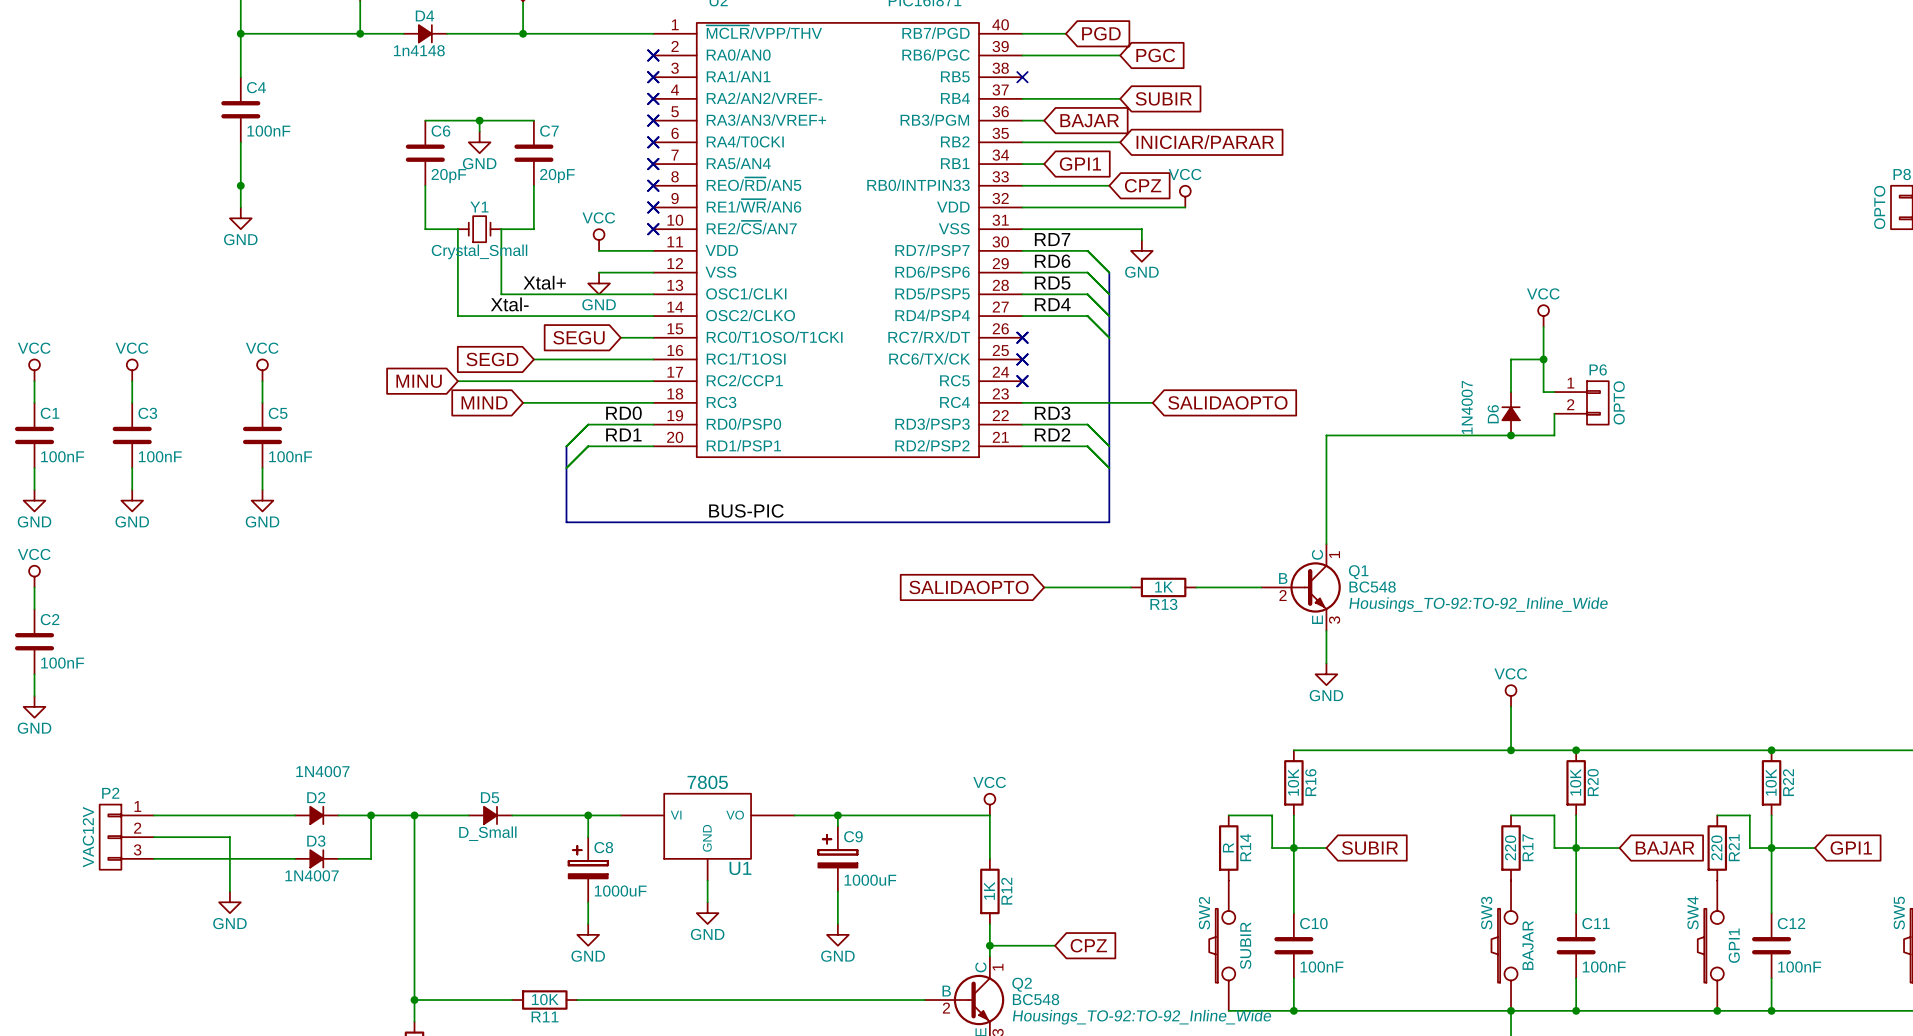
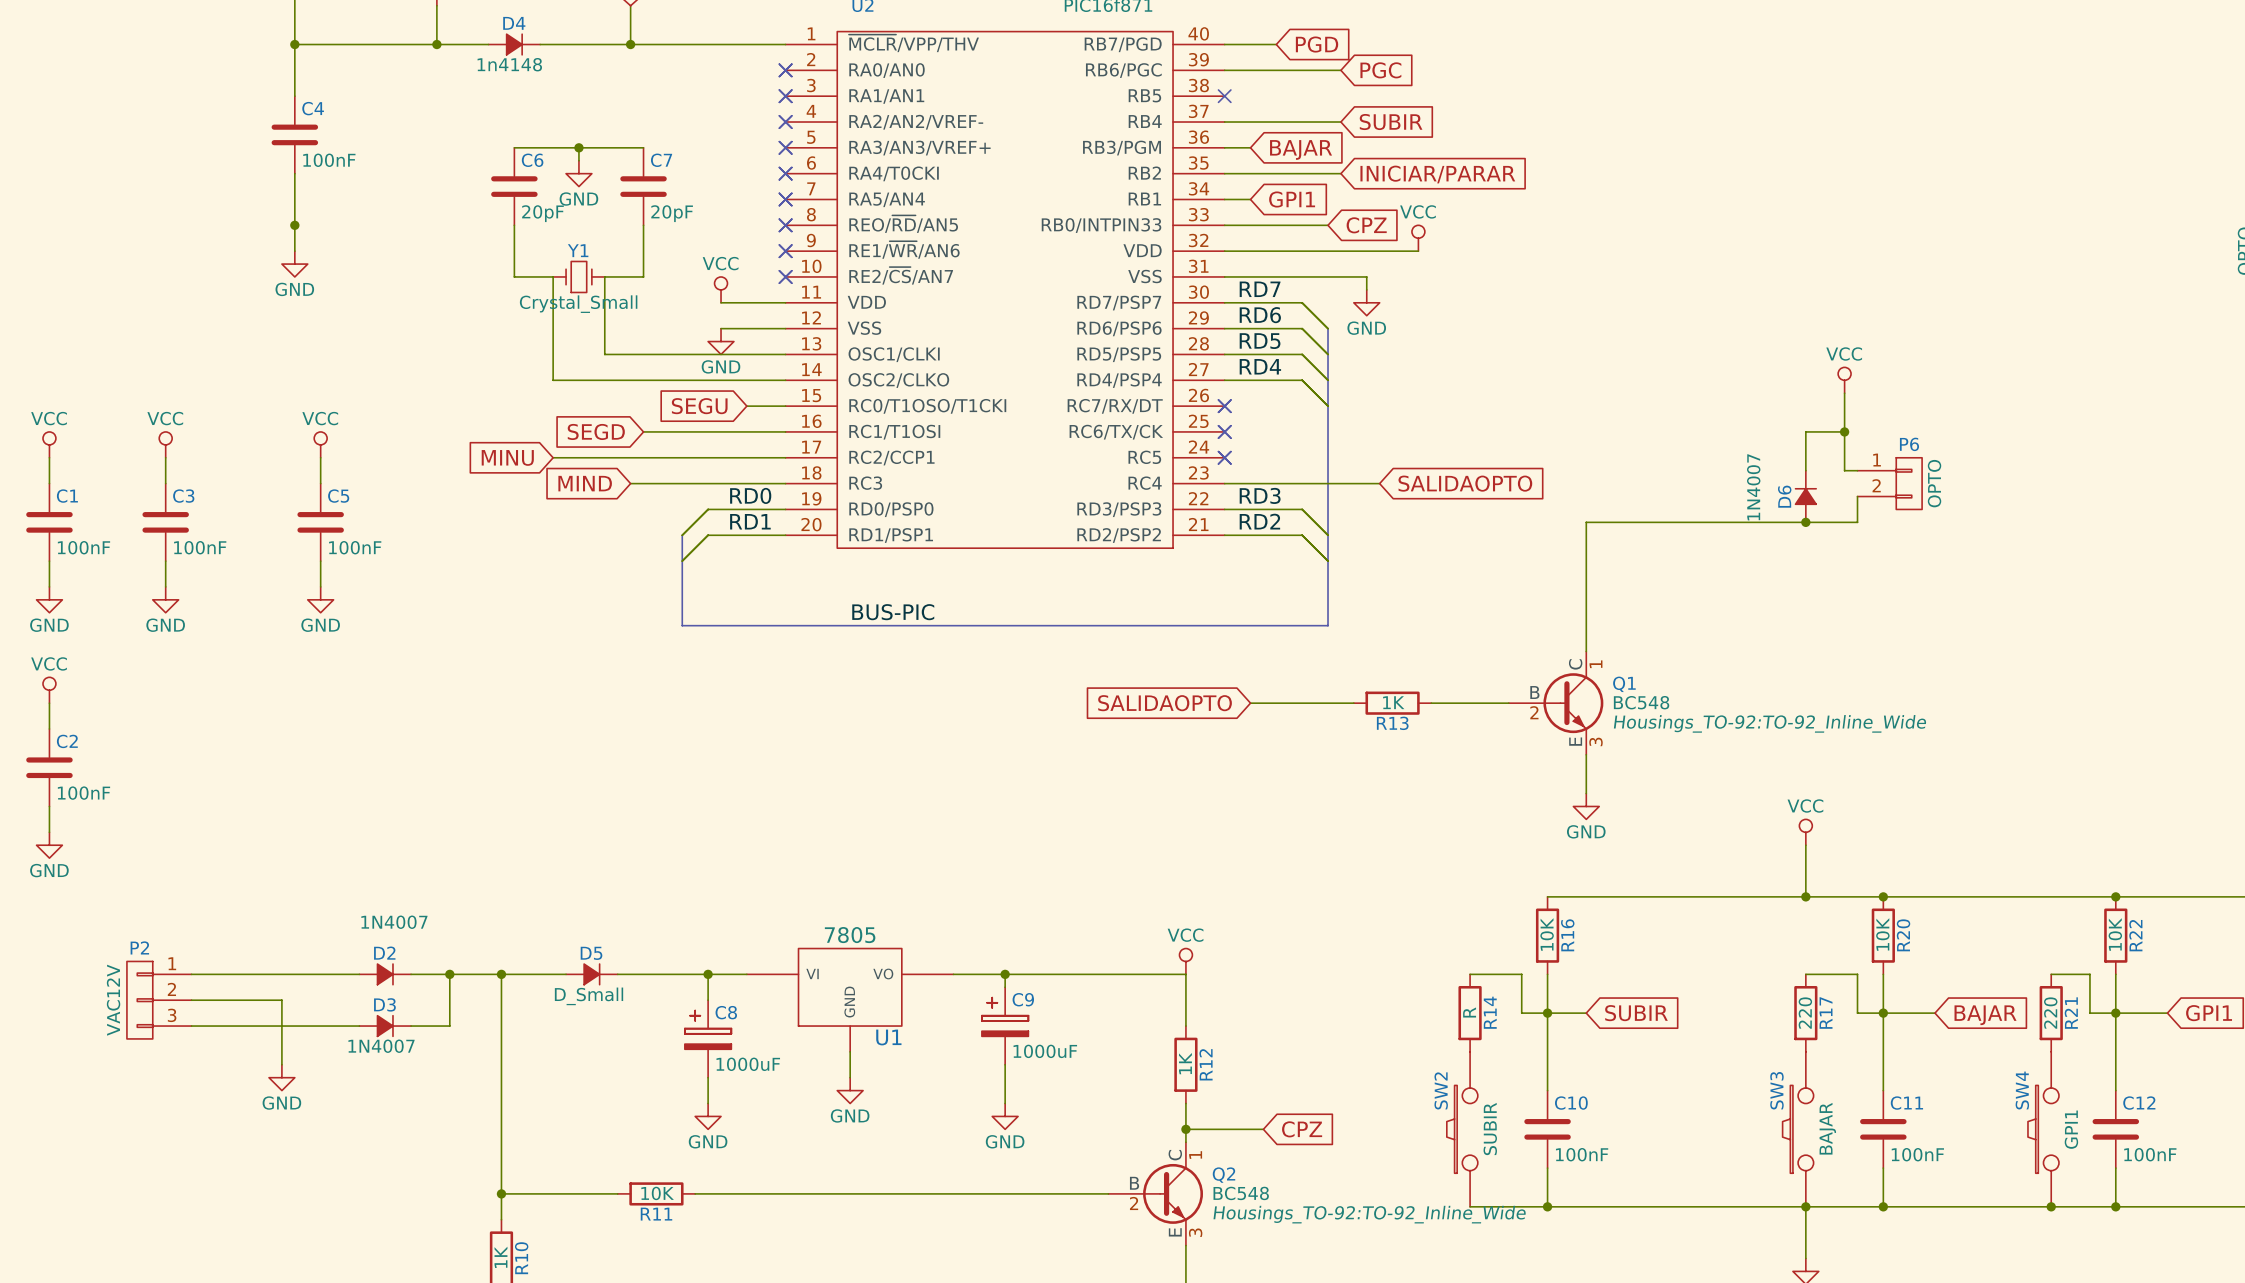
label: Xtal+ (544, 282) -> none
label: Xtal- (509, 304) -> none

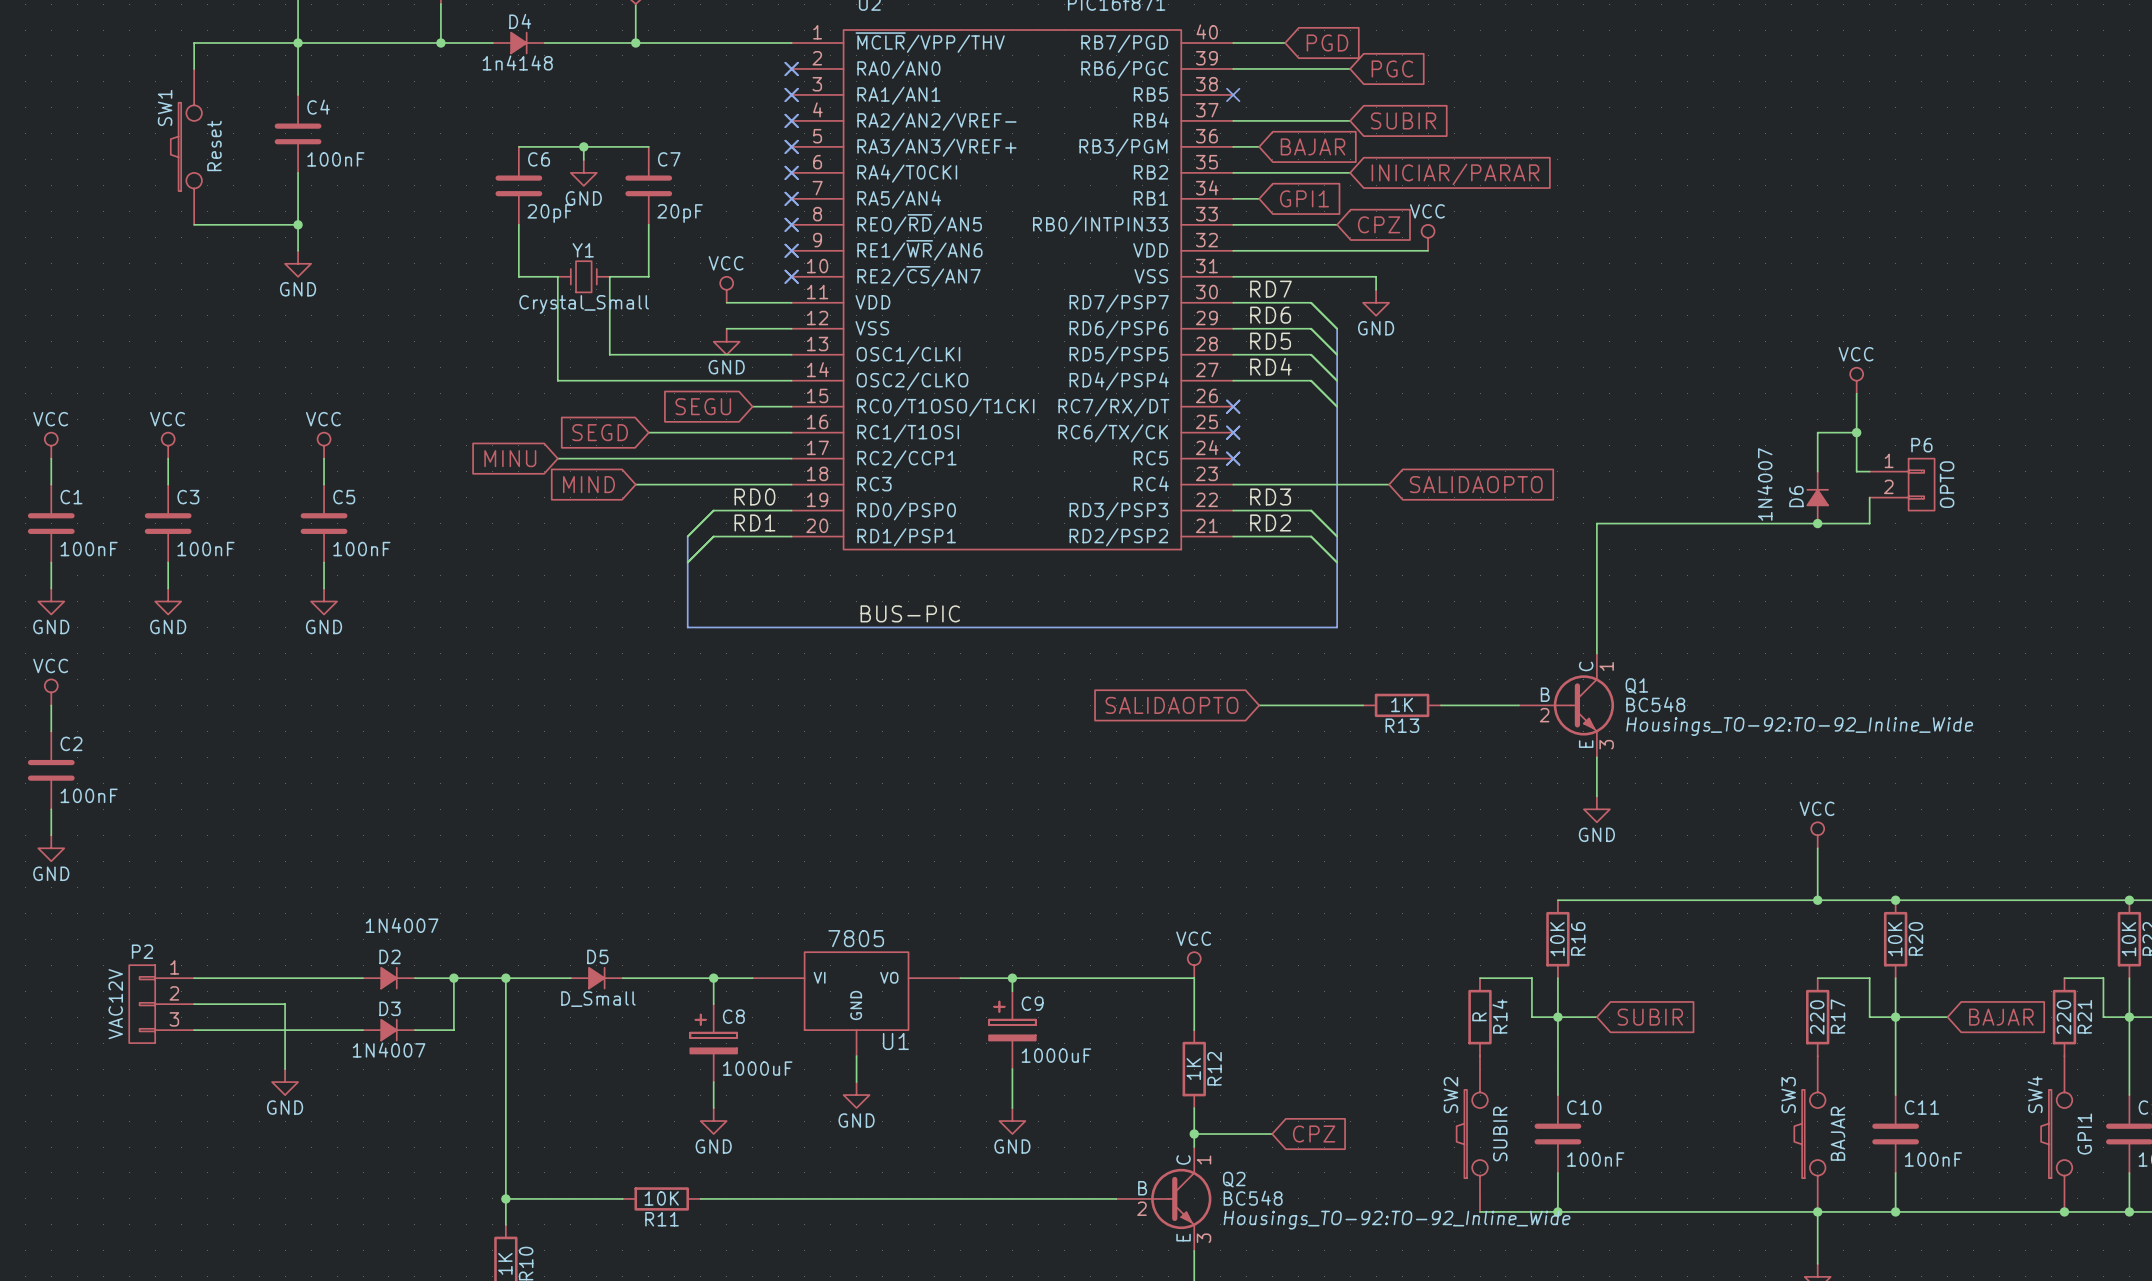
wire: none -> (298, 43) (194, 43) (194, 68)
SW1: none -> Reset (186, 146)
wire: none -> (194, 224) (298, 224)

